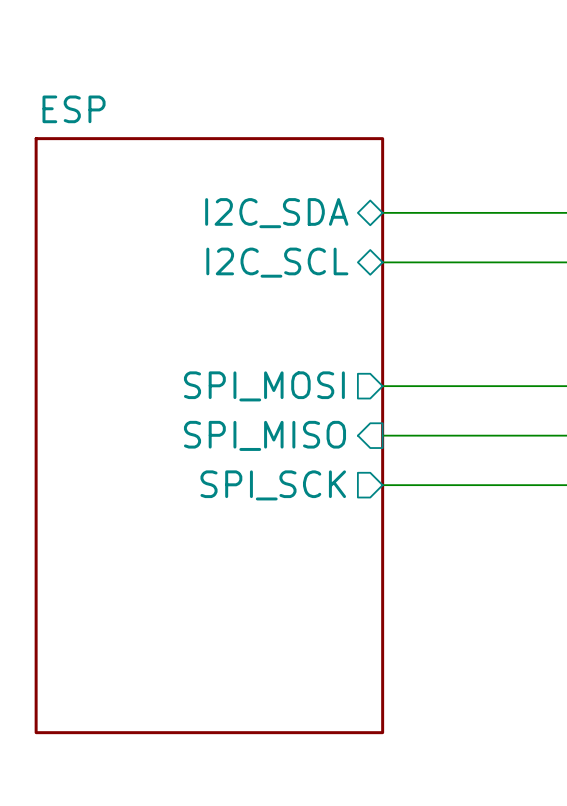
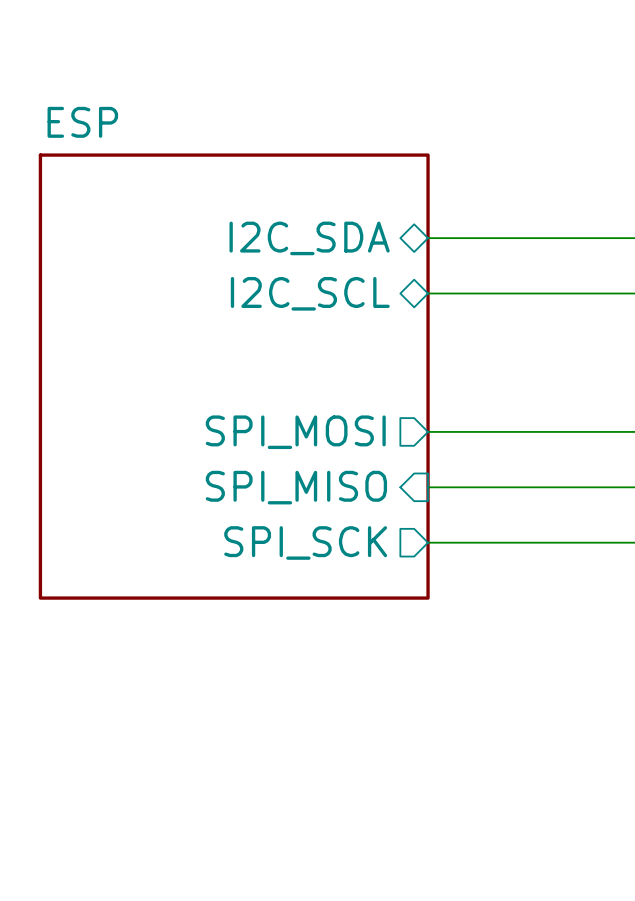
sheet ESP: none -> (234, 376)
sheet ESP: (209, 435) -> none

